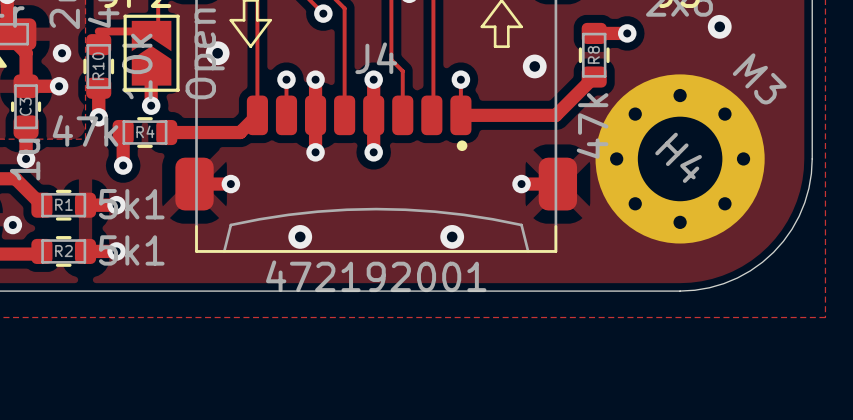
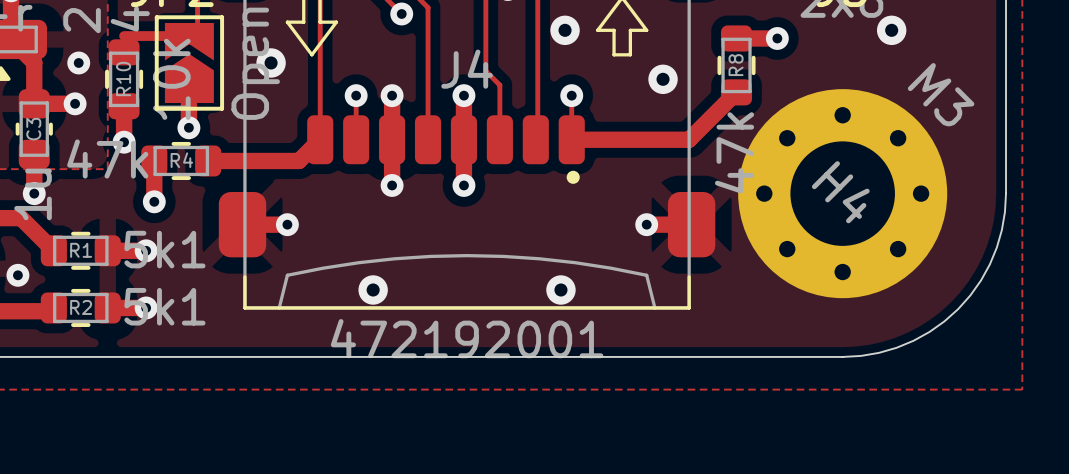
via: none -> (565, 30)

